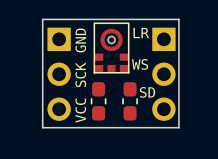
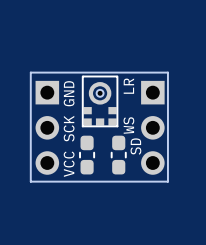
text rotation: 0° (141, 33) -> 90° counterclockwise (128, 86)
text rotation: 0° (140, 64) -> 90° counterclockwise (128, 125)
text rotation: 0° (147, 92) -> 90° counterclockwise (135, 146)

